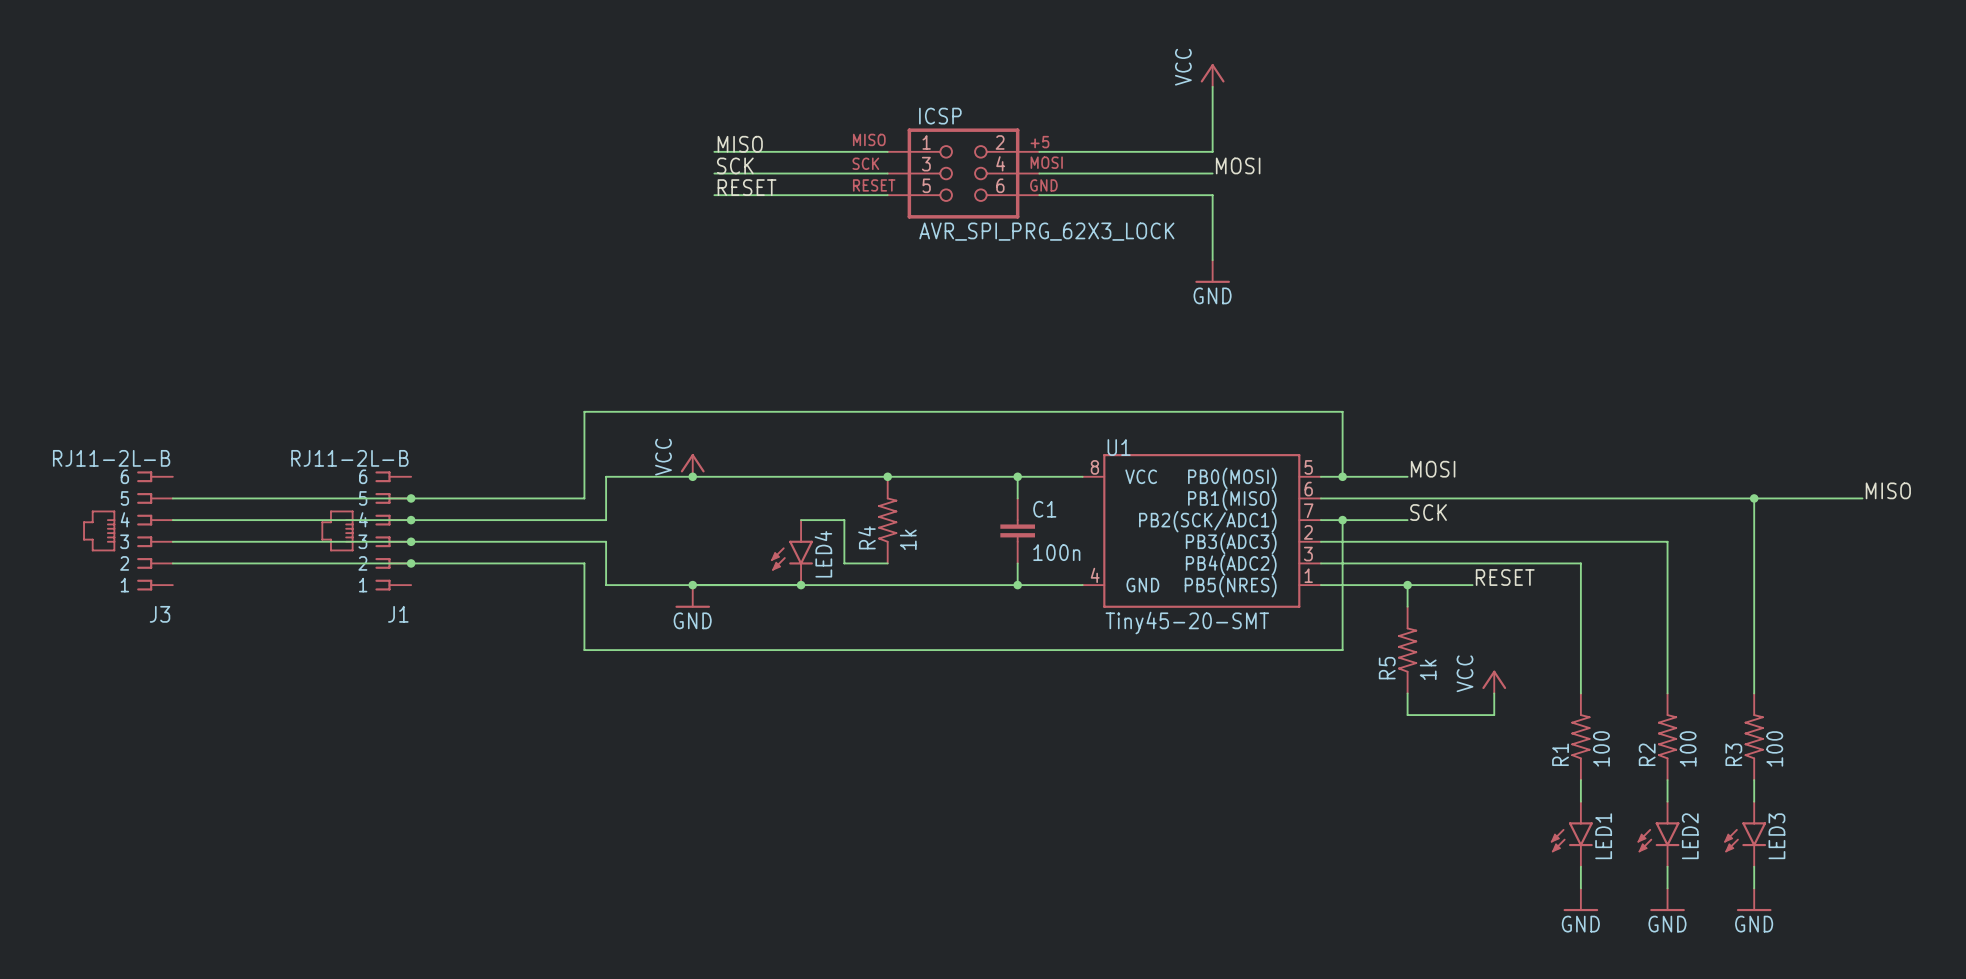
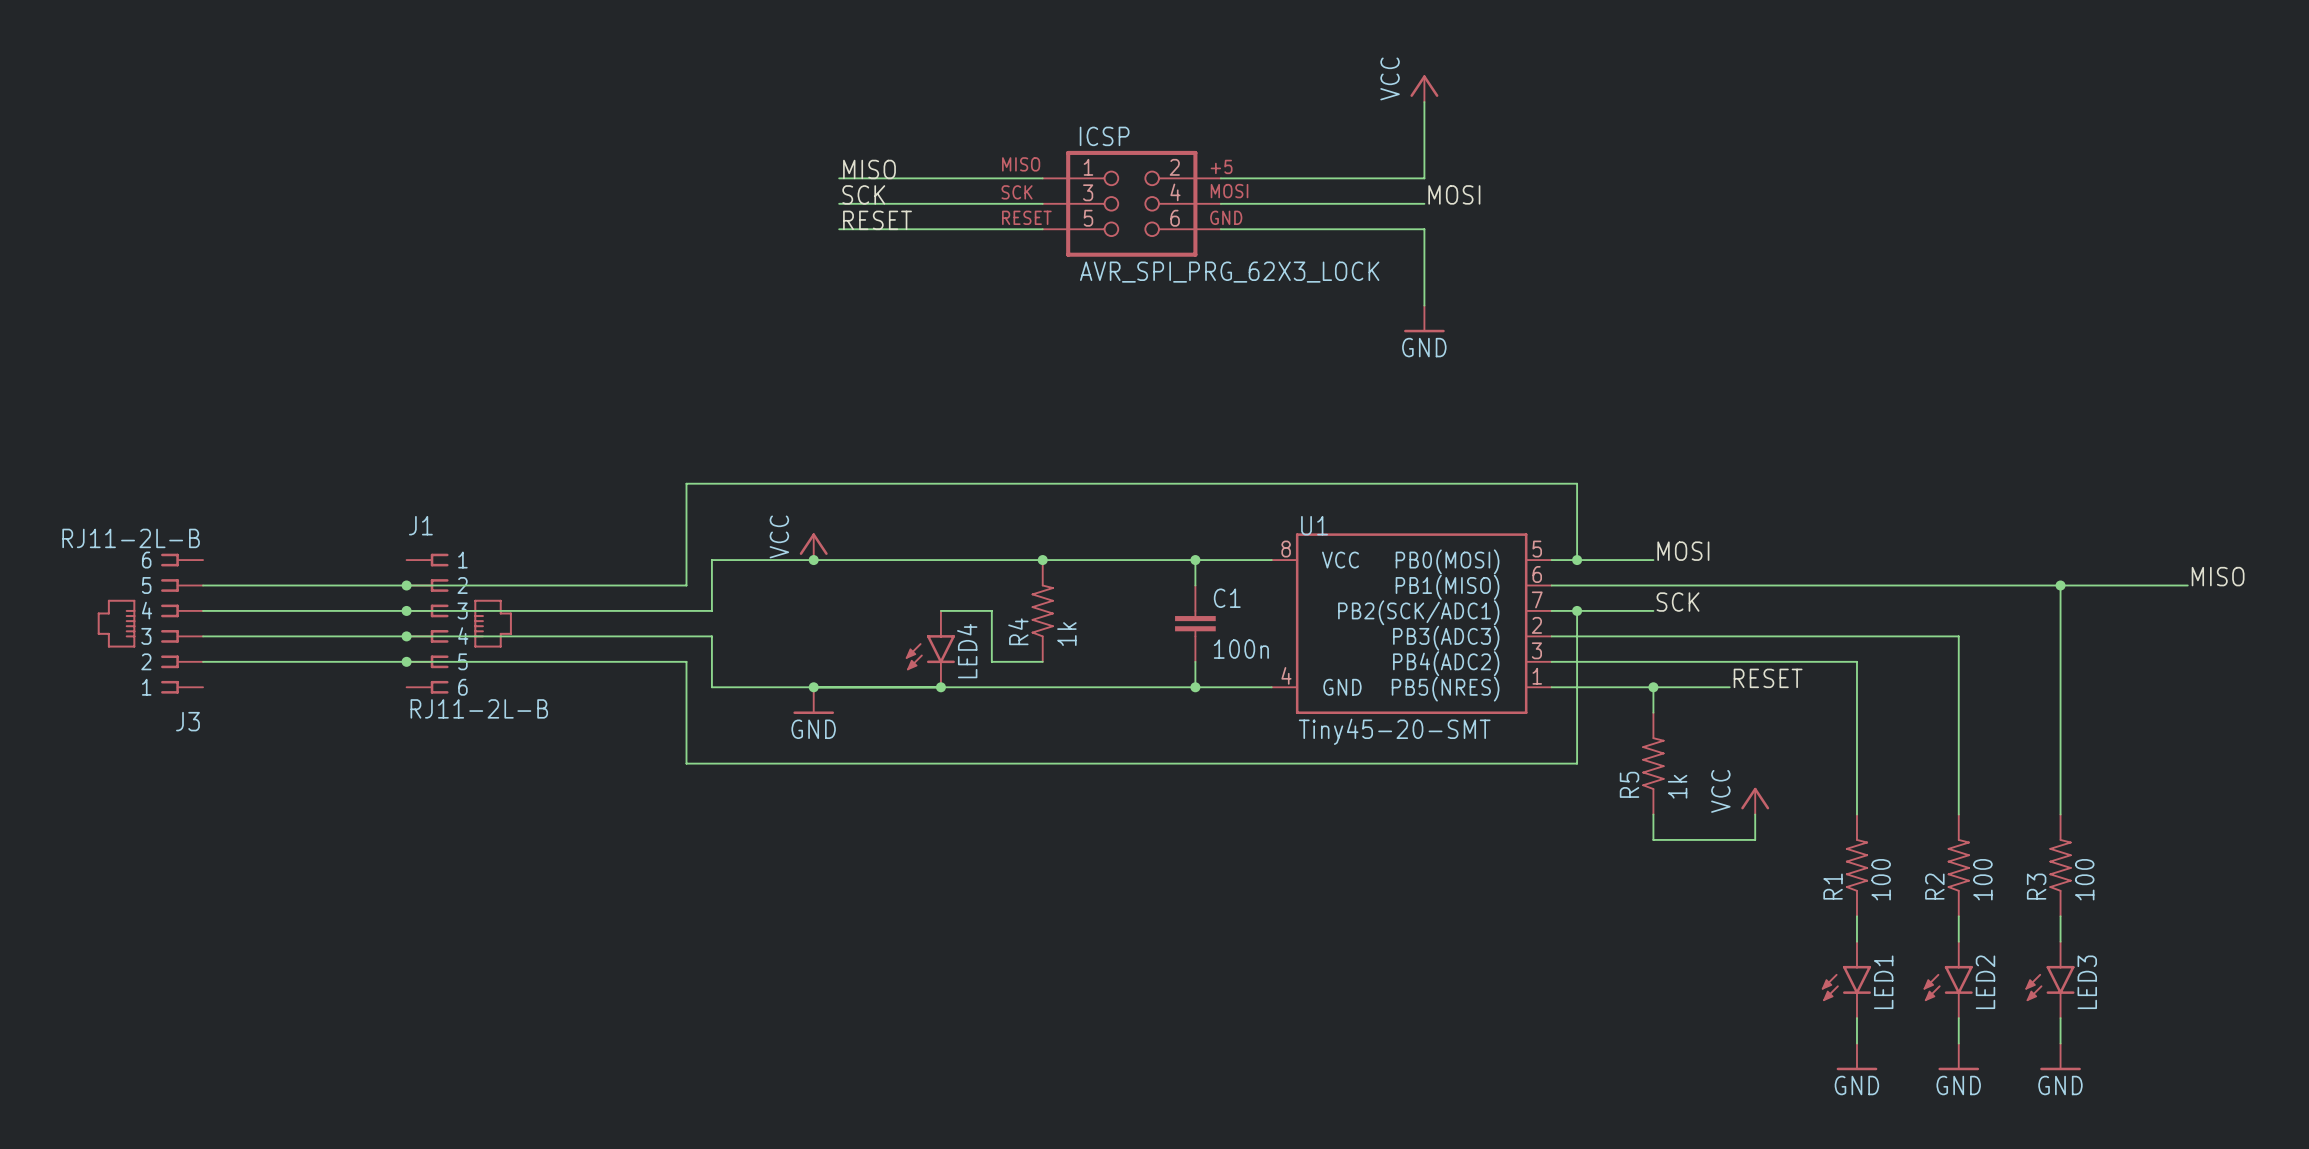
junction: none -> (406, 585)
junction: (411, 498) -> none
junction: none -> (406, 610)
junction: (411, 520) -> none
J1 rotation: 0° (356, 530) -> 180° (471, 623)
junction: none -> (406, 636)
junction: (411, 541) -> none
junction: none -> (406, 661)
junction: (411, 563) -> none

